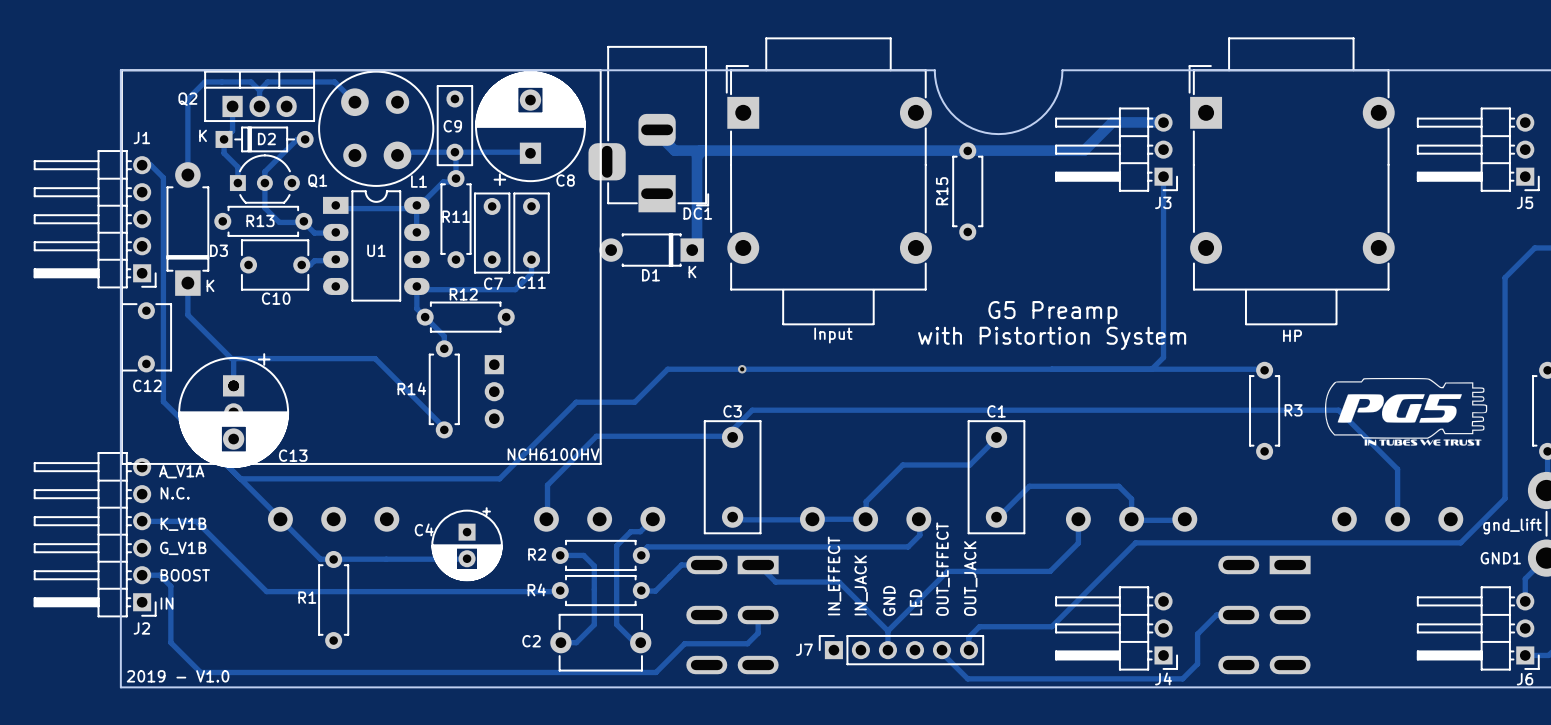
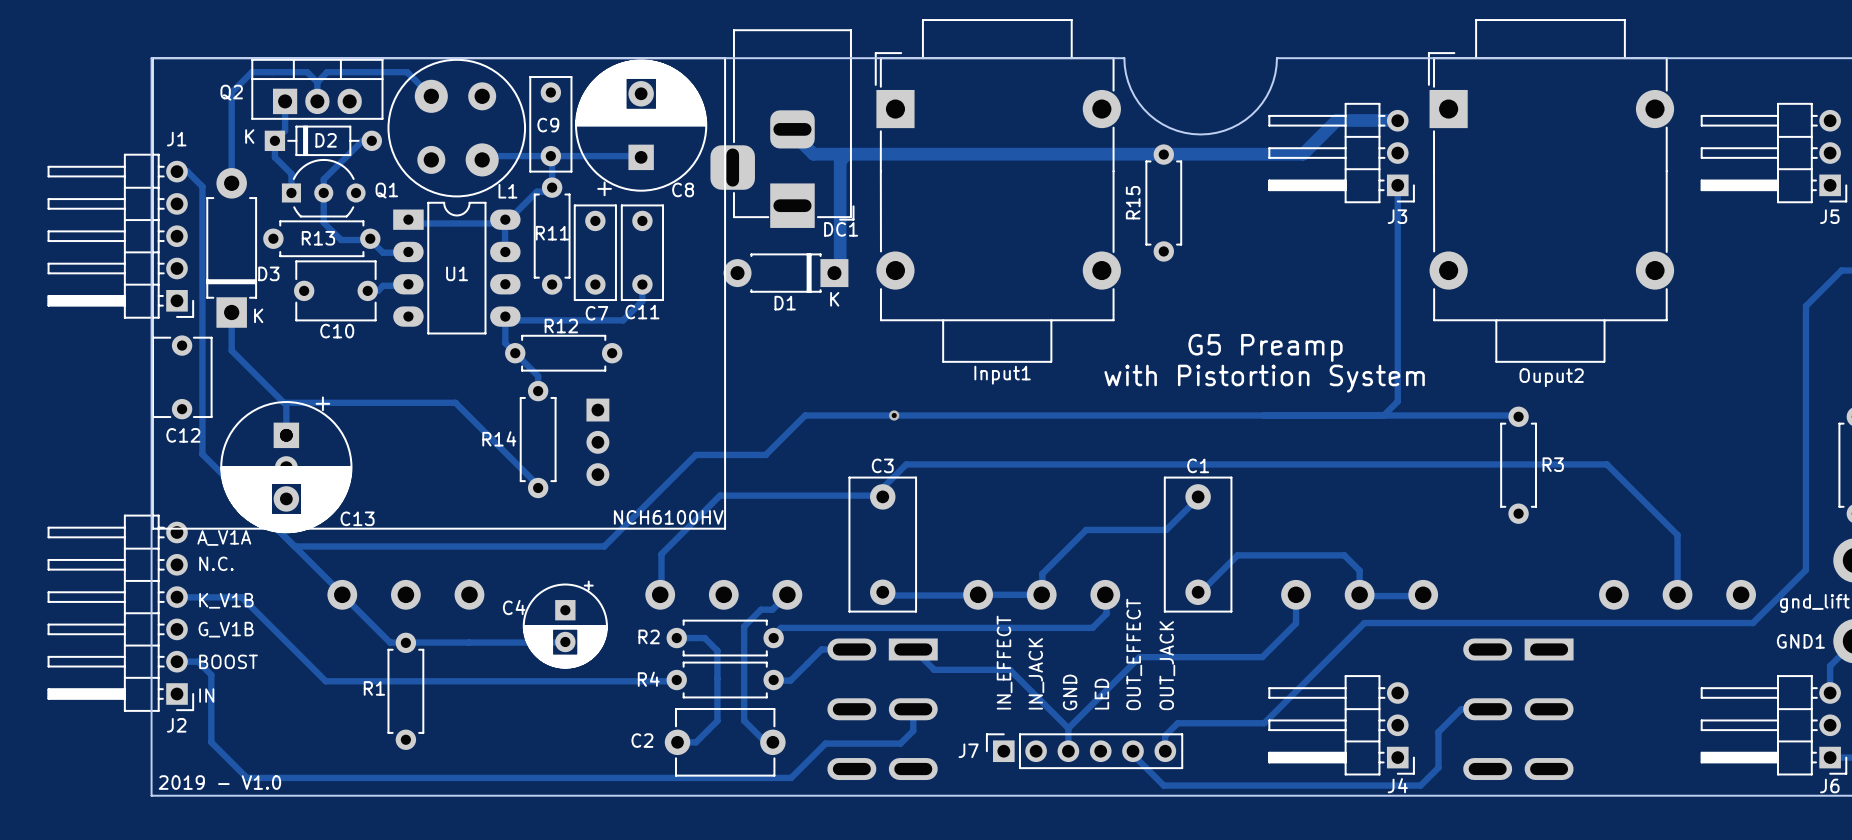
Input name: Input (833, 335) -> Input1 (1002, 375)
HP name: HP (1292, 335) -> Ouput2 (1551, 377)
drawing: [1324, 377, 1488, 446] -> none

